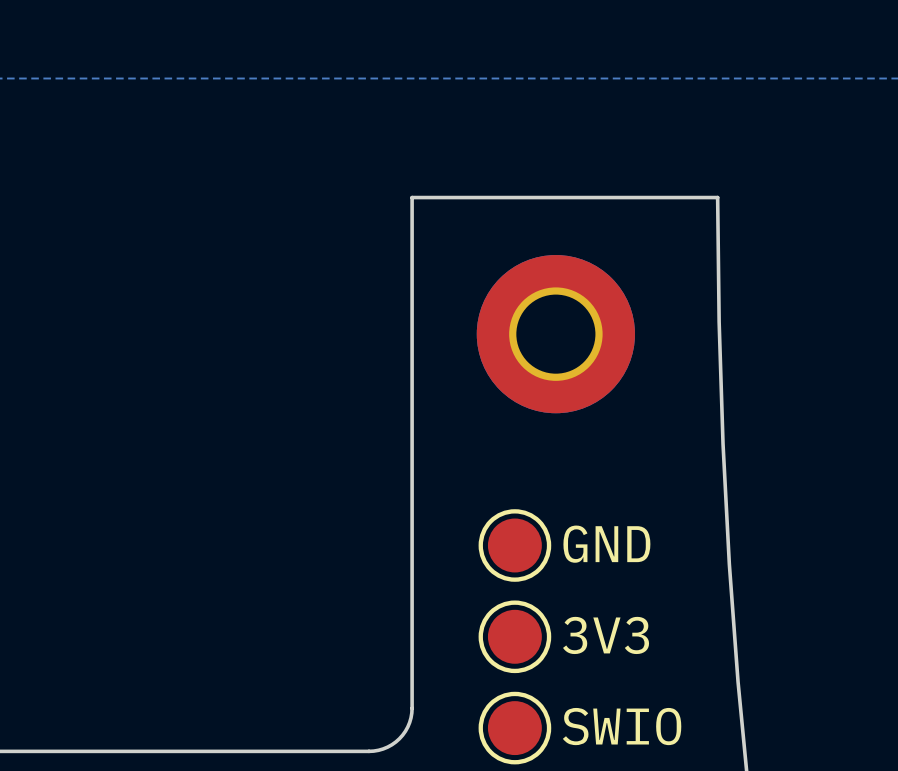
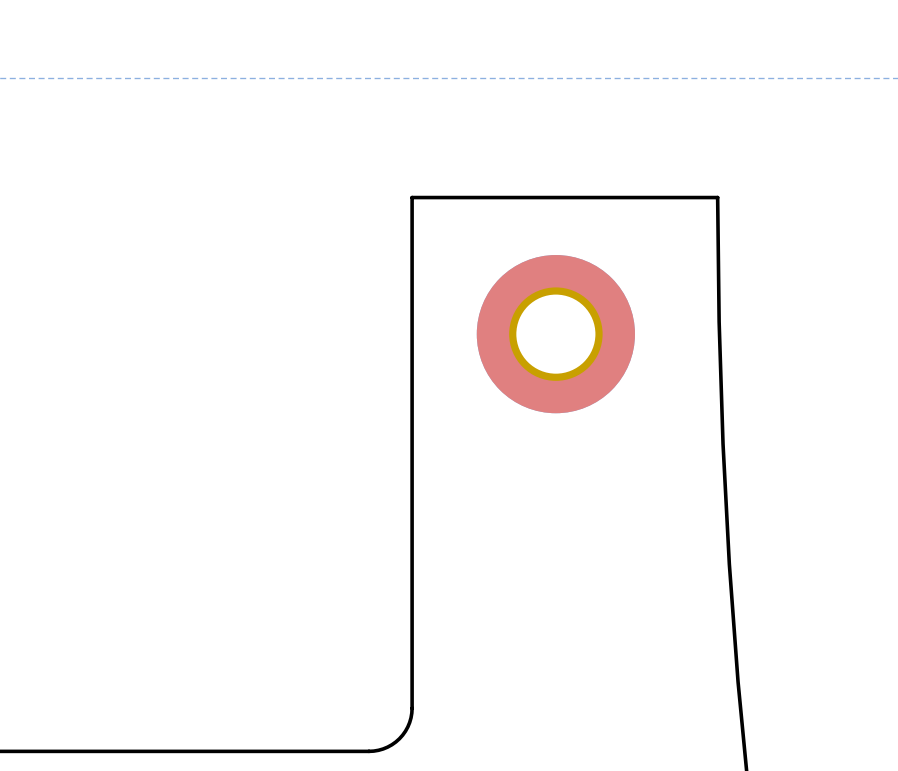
part: GND (514, 545) -> none
part: 3V3 (514, 636) -> none
part: SWIO (514, 728) -> none

